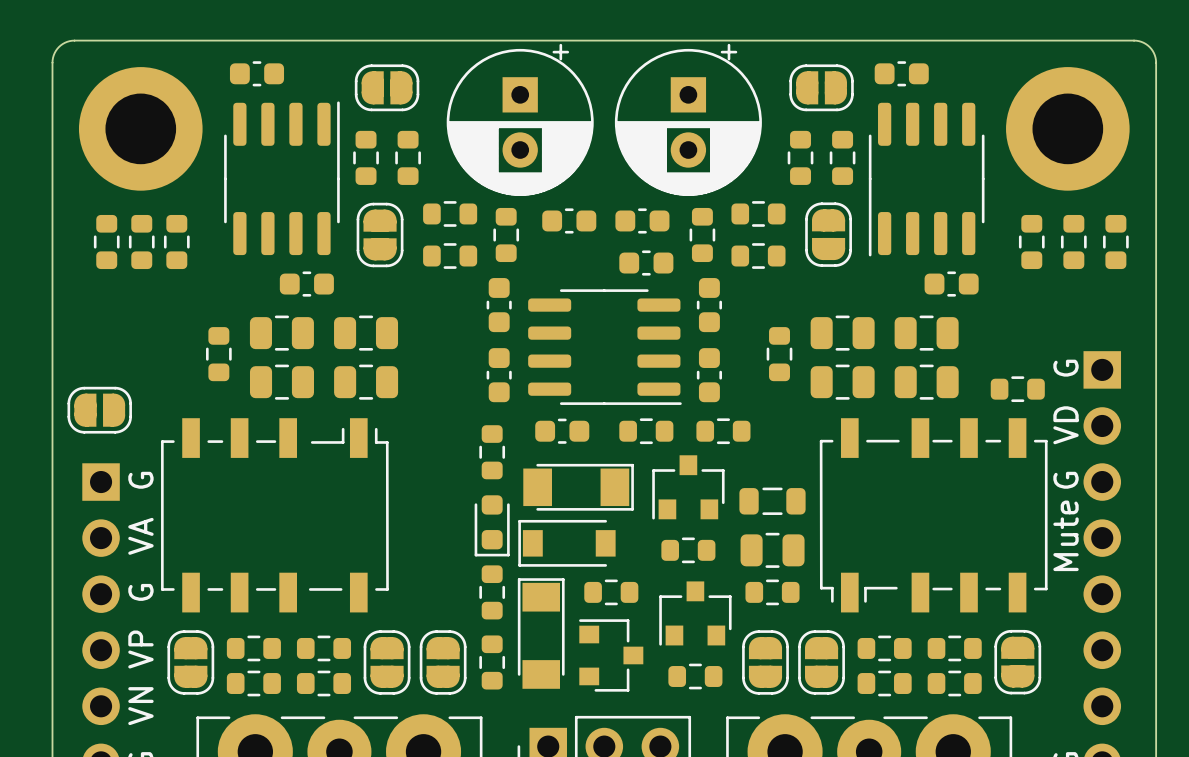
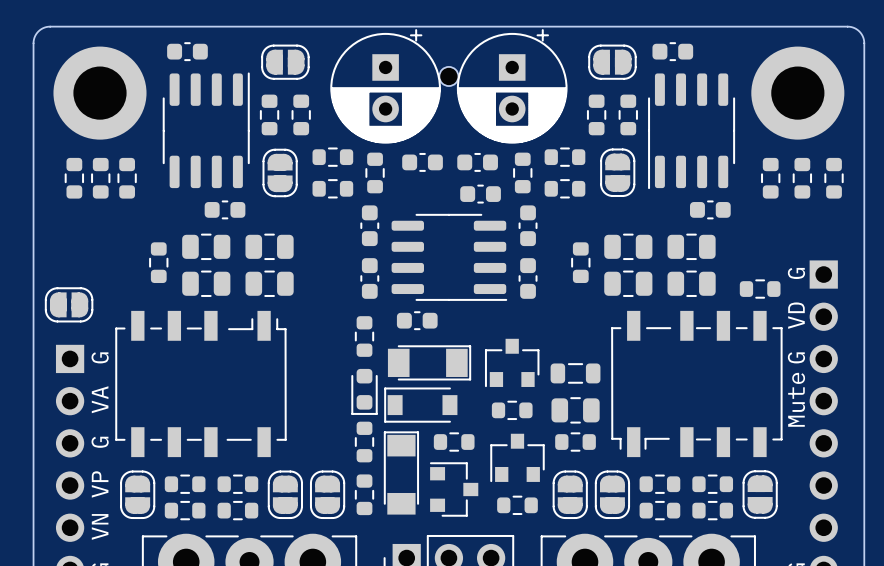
part: none -> (448, 76)
part: (646, 431) -> none
part: (723, 431) -> none

